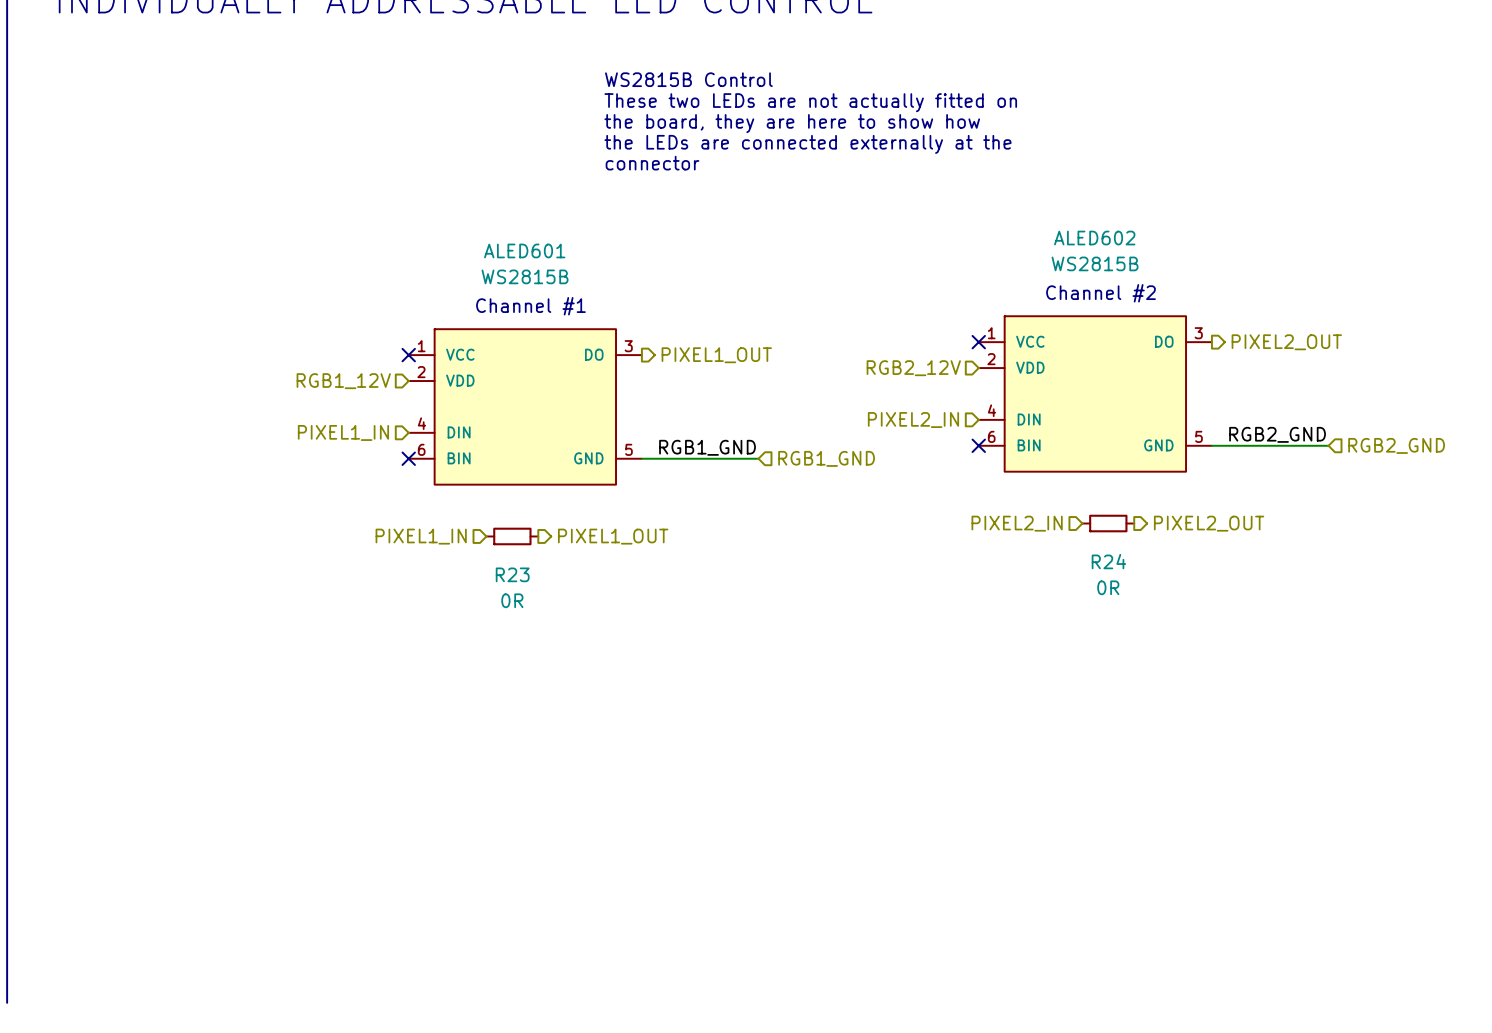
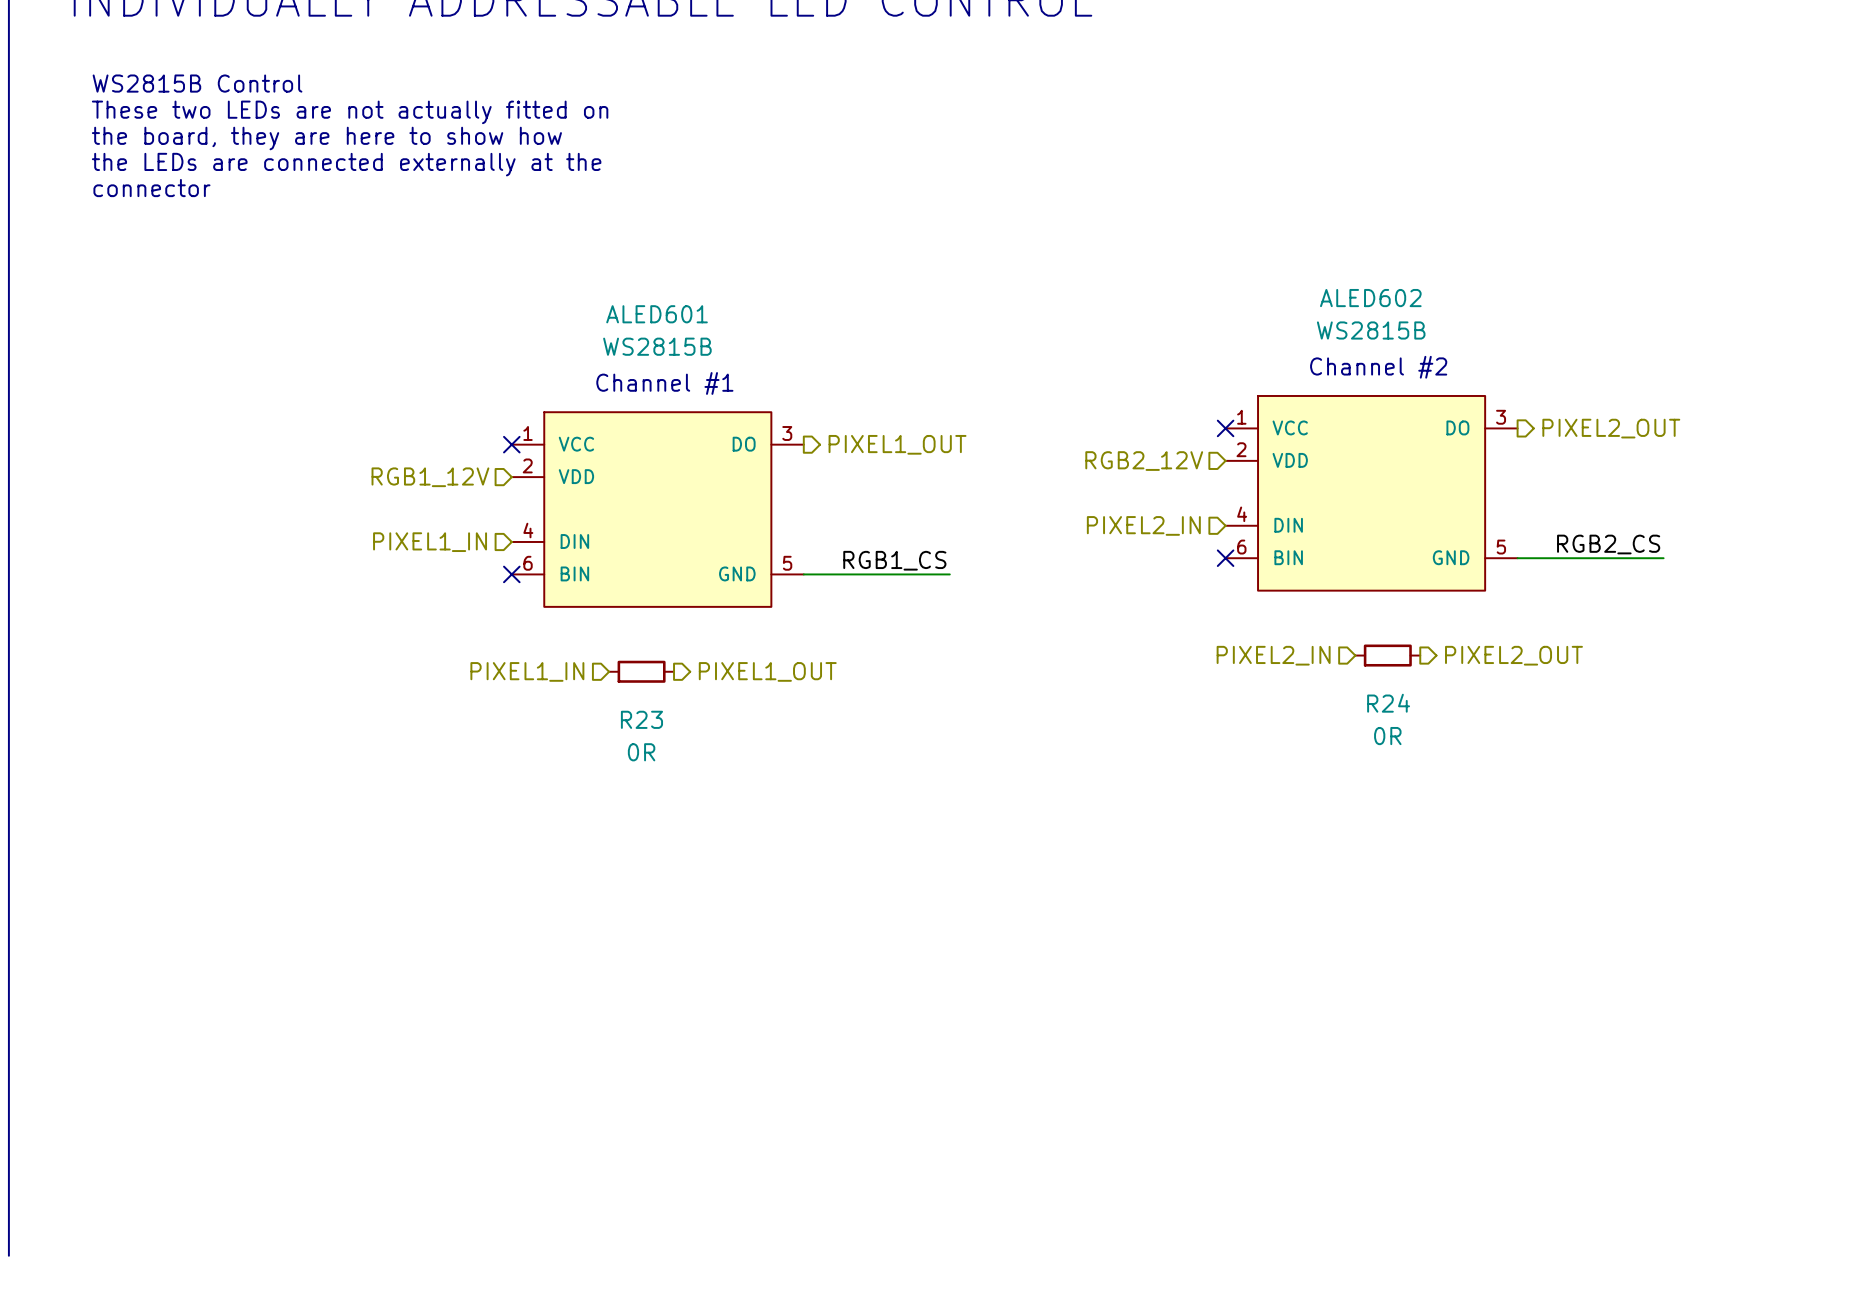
text: none -> WS2815B Control (197, 83)
text: WS2815B Control (688, 79) -> none
text: none -> These two LEDs are not actually fitted on (350, 112)
text: These two LEDs are not actually fitted on (810, 102) -> none
text: none -> the board, they are here to show how (326, 138)
text: the board, they are here to show how (792, 123) -> none
text: none -> the LEDs are connected externally at the (346, 164)
text: the LEDs are connected externally at the (807, 144) -> none
text: none -> connector (151, 188)
text: connector (652, 163) -> none
label: RGB2_GND (1277, 434) -> RGB2_CS (1608, 544)
hierarchical label: RGB2_GND (1396, 445) -> none
label: RGB1_GND (707, 447) -> RGB1_CS (894, 560)
hierarchical label: RGB1_GND (826, 458) -> none

